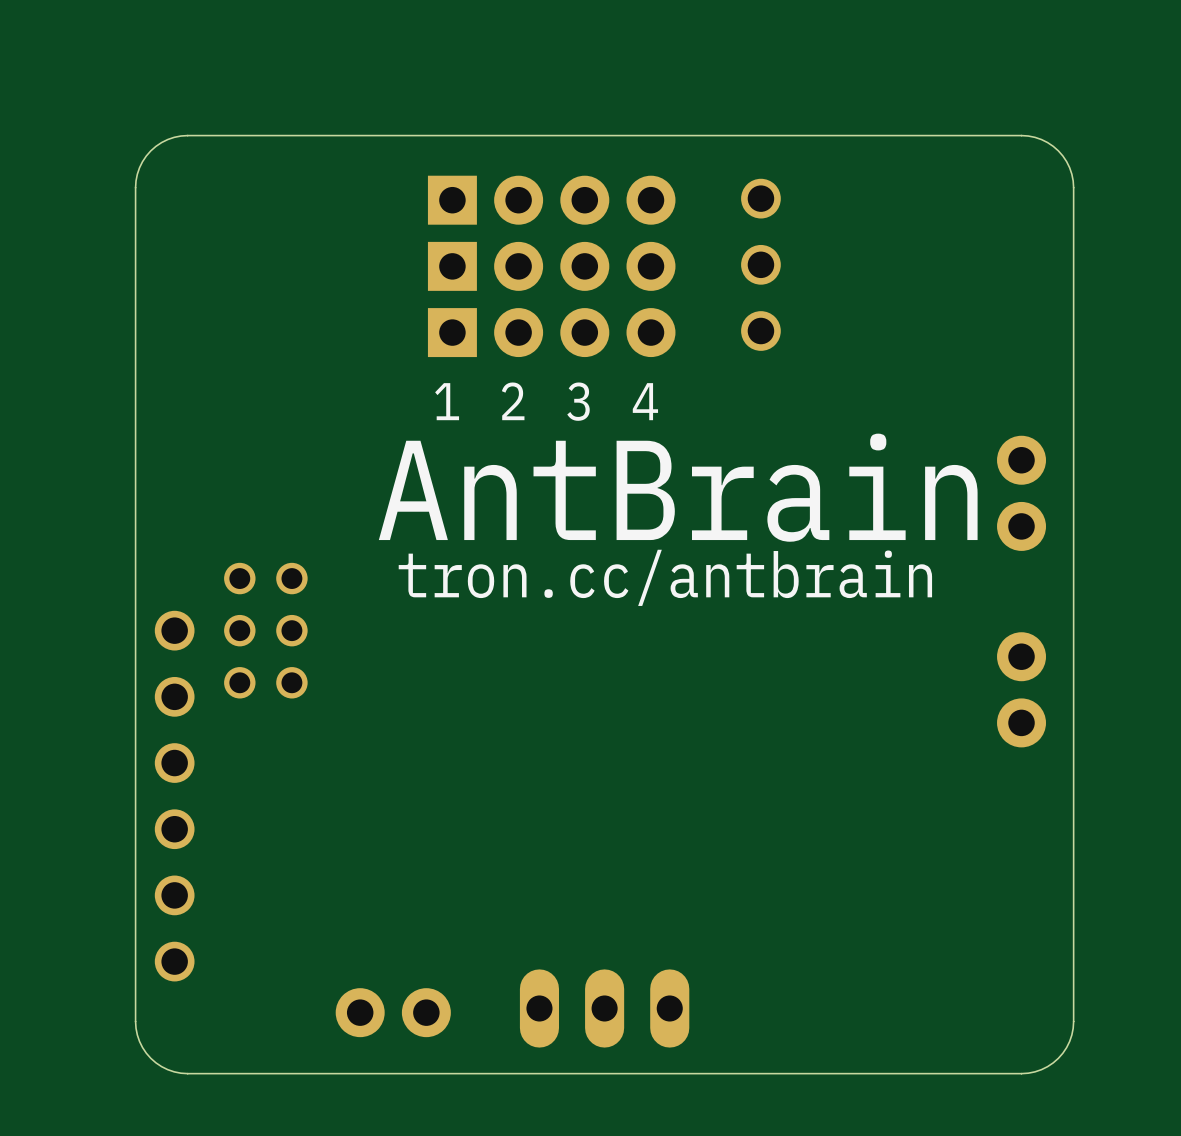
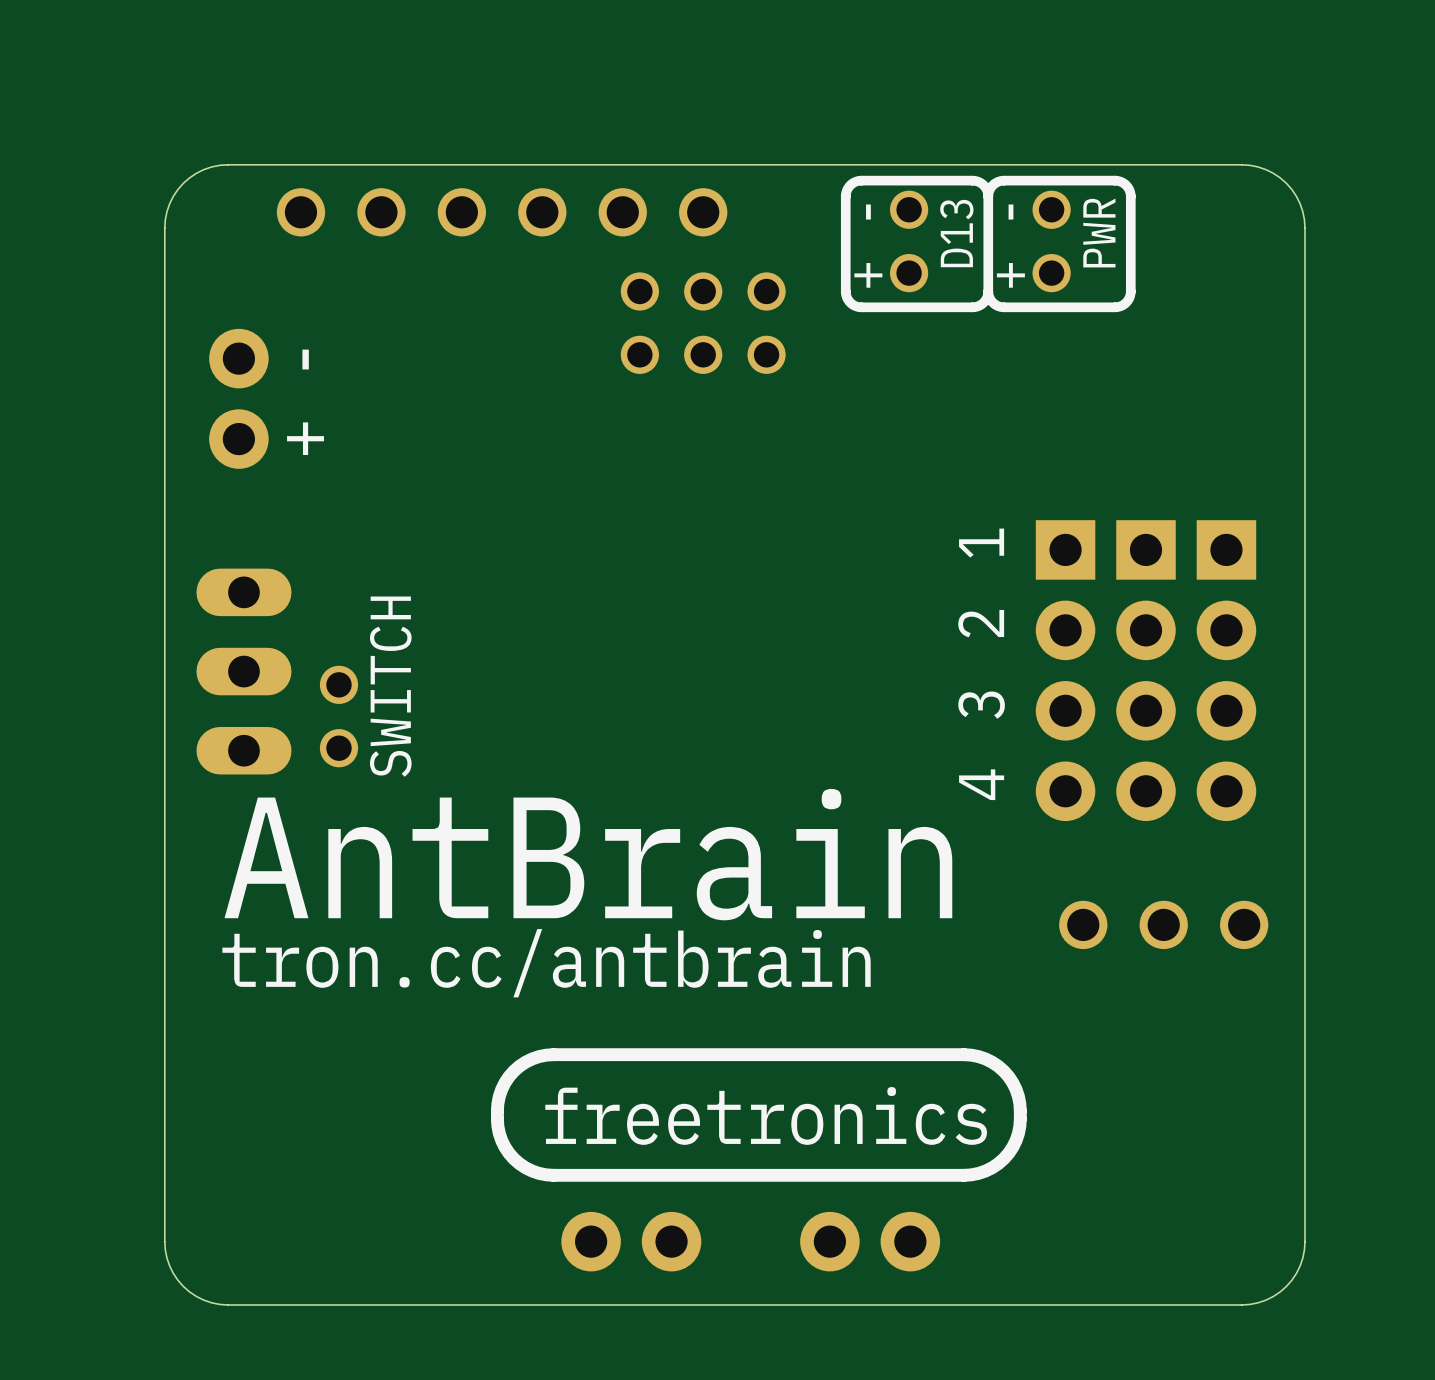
line: none -> (988, 196) (988, 291)
line: none -> (988, 196) (983, 185) (972, 180) (859, 180) (850, 185) (845, 196) (845, 293) (849, 301) (853, 305) (861, 307) (974, 307) (983, 302) (988, 291)
line: none -> (988, 196) (992, 185) (1004, 180) (1117, 180) (1126, 185) (1130, 196) (1130, 293) (1127, 301) (1122, 305) (1114, 307) (1002, 307) (992, 302) (988, 291)
part: none -> (502, 212)
text: none -> - (868, 212)
text: none -> - (1010, 212)
text: none -> PWR (1099, 233)
text: none -> D13 (956, 233)
part: none -> (909, 241)
part: none -> (1051, 241)
part: (551, 200) -> none
text: none -> + (868, 275)
text: none -> + (1010, 275)
part rotation: 0° (760, 264) -> 90° clockwise (1163, 924)
part position: (760, 264) -> (1163, 924)
part: (551, 266) -> none
text: none -> - (305, 359)
part: none -> (238, 398)
part: (551, 332) -> none
text: none -> + (305, 438)
text rotation: 0° (447, 401) -> 90° counterclockwise (981, 543)
text position: 1 (447, 401) -> 1 (981, 543)
text rotation: 0° (513, 401) -> 90° counterclockwise (981, 623)
text position: 2 (513, 401) -> 2 (981, 623)
text rotation: 0° (578, 401) -> 90° counterclockwise (981, 705)
text position: 3 (578, 401) -> 3 (981, 705)
text rotation: 0° (645, 401) -> 90° counterclockwise (981, 784)
text position: 4 (645, 401) -> 4 (981, 784)
text: AntBrain (678, 487) -> none
part: (1021, 493) -> none
part: none -> (1065, 670)
part: none -> (1146, 670)
part: none -> (1226, 670)
text: none -> SWITCH (390, 686)
text: tron.cc/antbrain (665, 577) -> none
part: none -> (338, 716)
part rotation: 0° (265, 630) -> 90° clockwise (703, 323)
part position: (265, 630) -> (703, 323)
part: (1021, 689) -> none
text: none -> AntBrain (588, 854)
text: none -> tron.cc/antbrain (546, 963)
part: (174, 796) -> none
line: none -> (964, 1054) (546, 1055) (525, 1062) (509, 1076) (499, 1096) (497, 1126) (501, 1140) (513, 1158) (532, 1171) (546, 1174) (971, 1174) (992, 1167) (1008, 1153) (1018, 1133) (1020, 1110) (1016, 1089) (1003, 1071) (985, 1058) (964, 1054)
text: none -> freetronics (766, 1115)
part rotation: 0° (604, 1008) -> 90° clockwise (243, 671)
part position: (604, 1008) -> (243, 671)
part position: (393, 1012) -> (631, 1241)
part: none -> (870, 1241)

